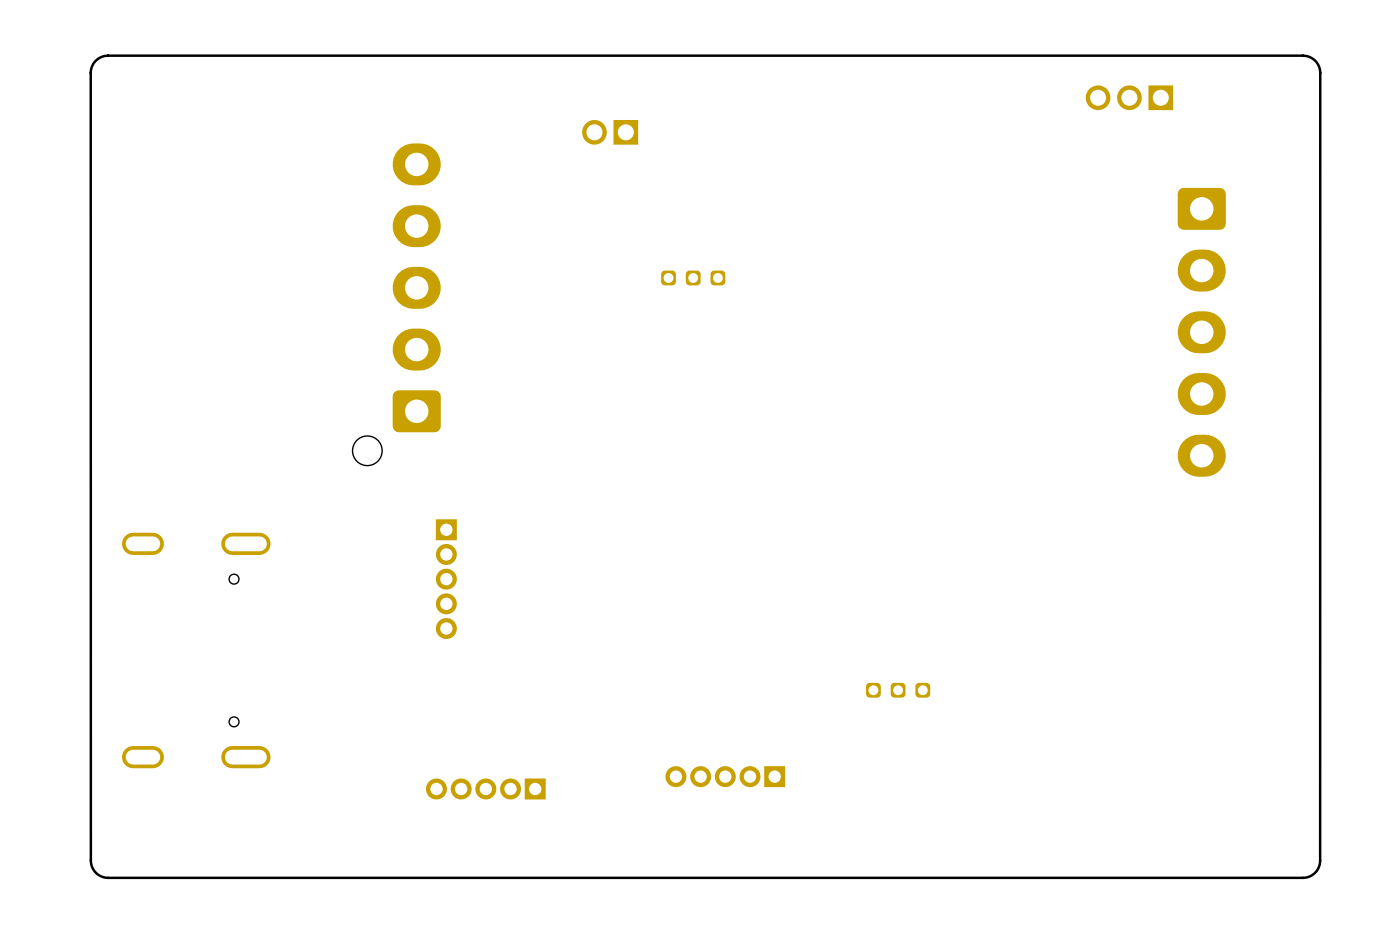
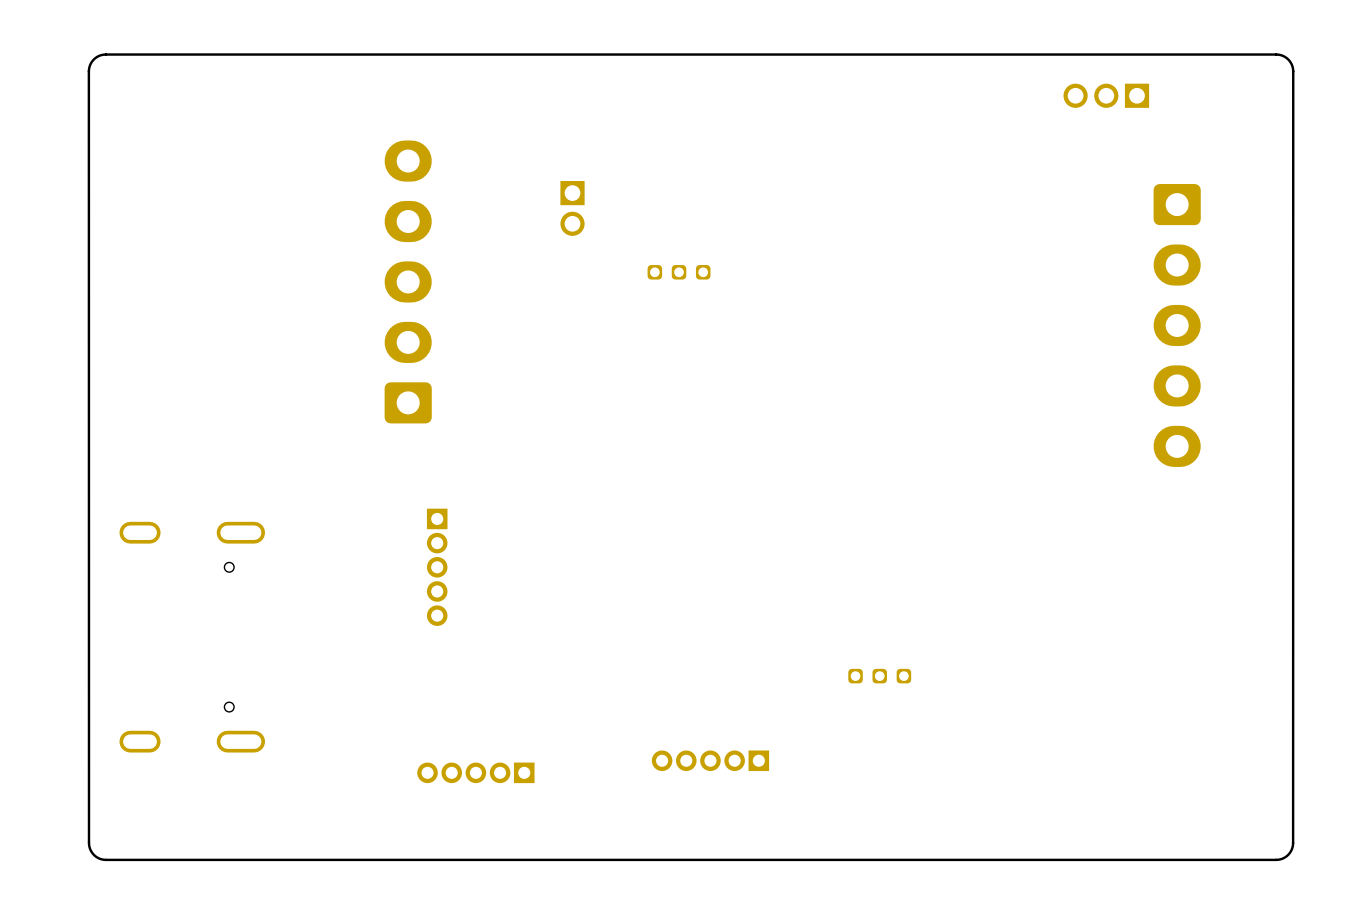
part rotation: 0° (610, 132) -> 90° counterclockwise (572, 208)
part position: (610, 132) -> (572, 208)
part: (396, 304) -> none

